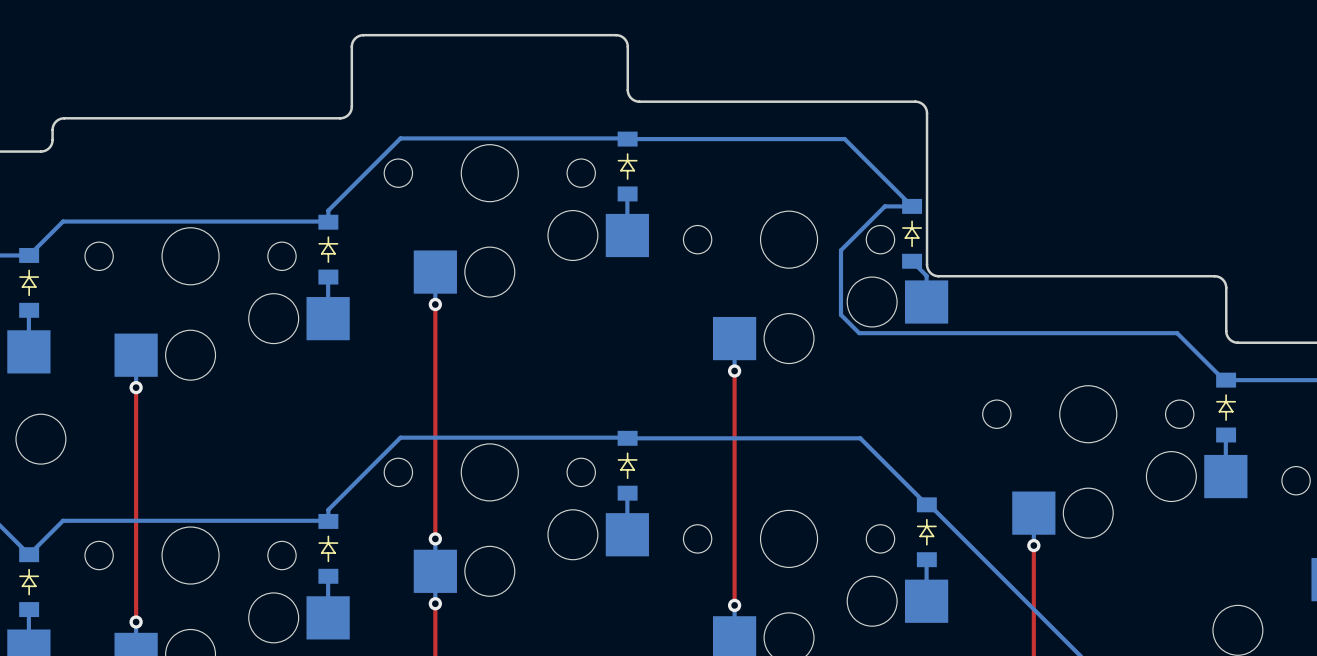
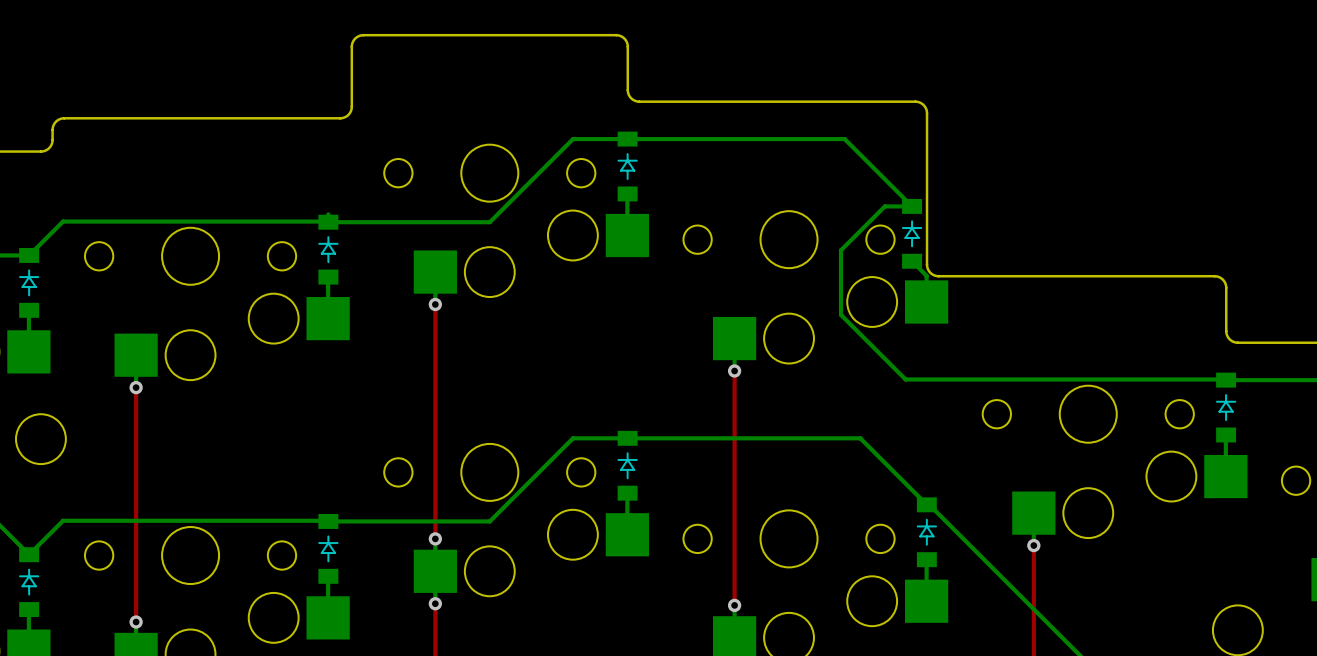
bottom track: (626, 138) (400, 138) (328, 210) (328, 214) -> none
bottom track: none -> (627, 139) (573, 139) (489, 222) (328, 222)
bottom track: (859, 333) (1177, 333) (1226, 380) -> (859, 333) (905, 379) (1226, 380)
bottom track: (627, 438) (400, 437) (328, 509) (328, 521) -> (627, 438) (573, 438) (489, 521) (328, 521)

